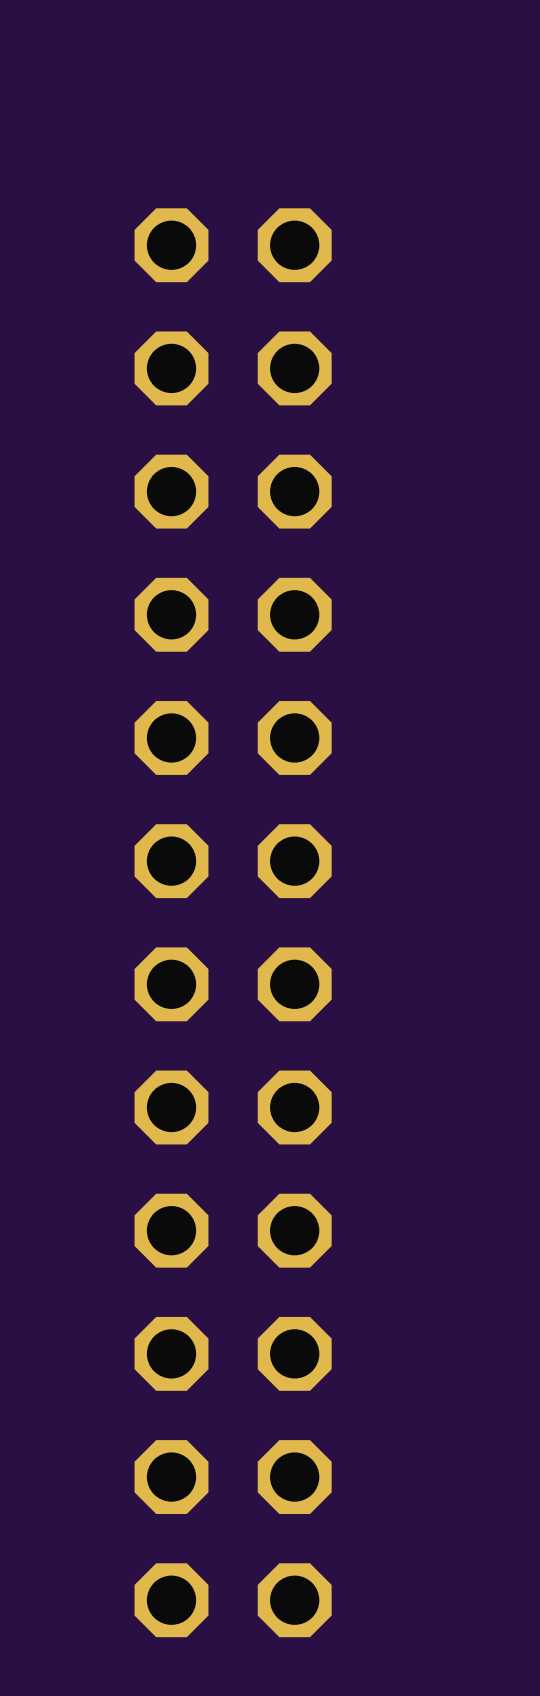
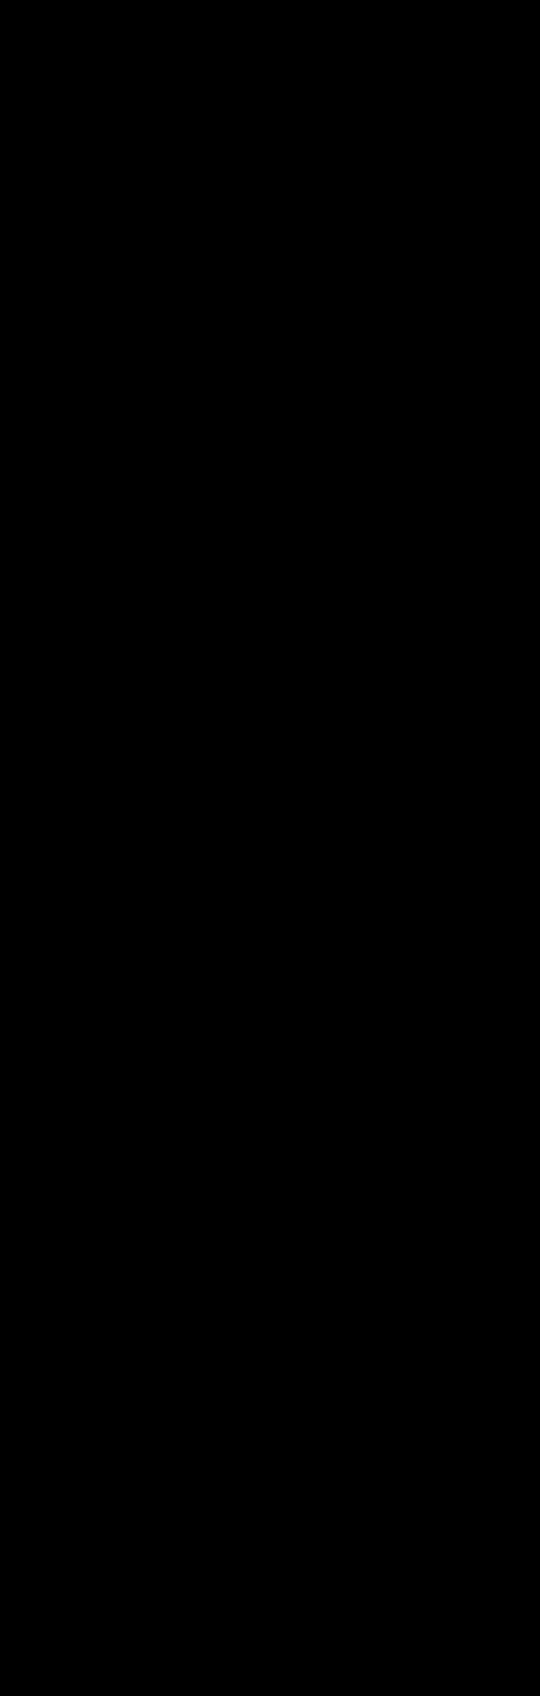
part: (233, 922) -> none

